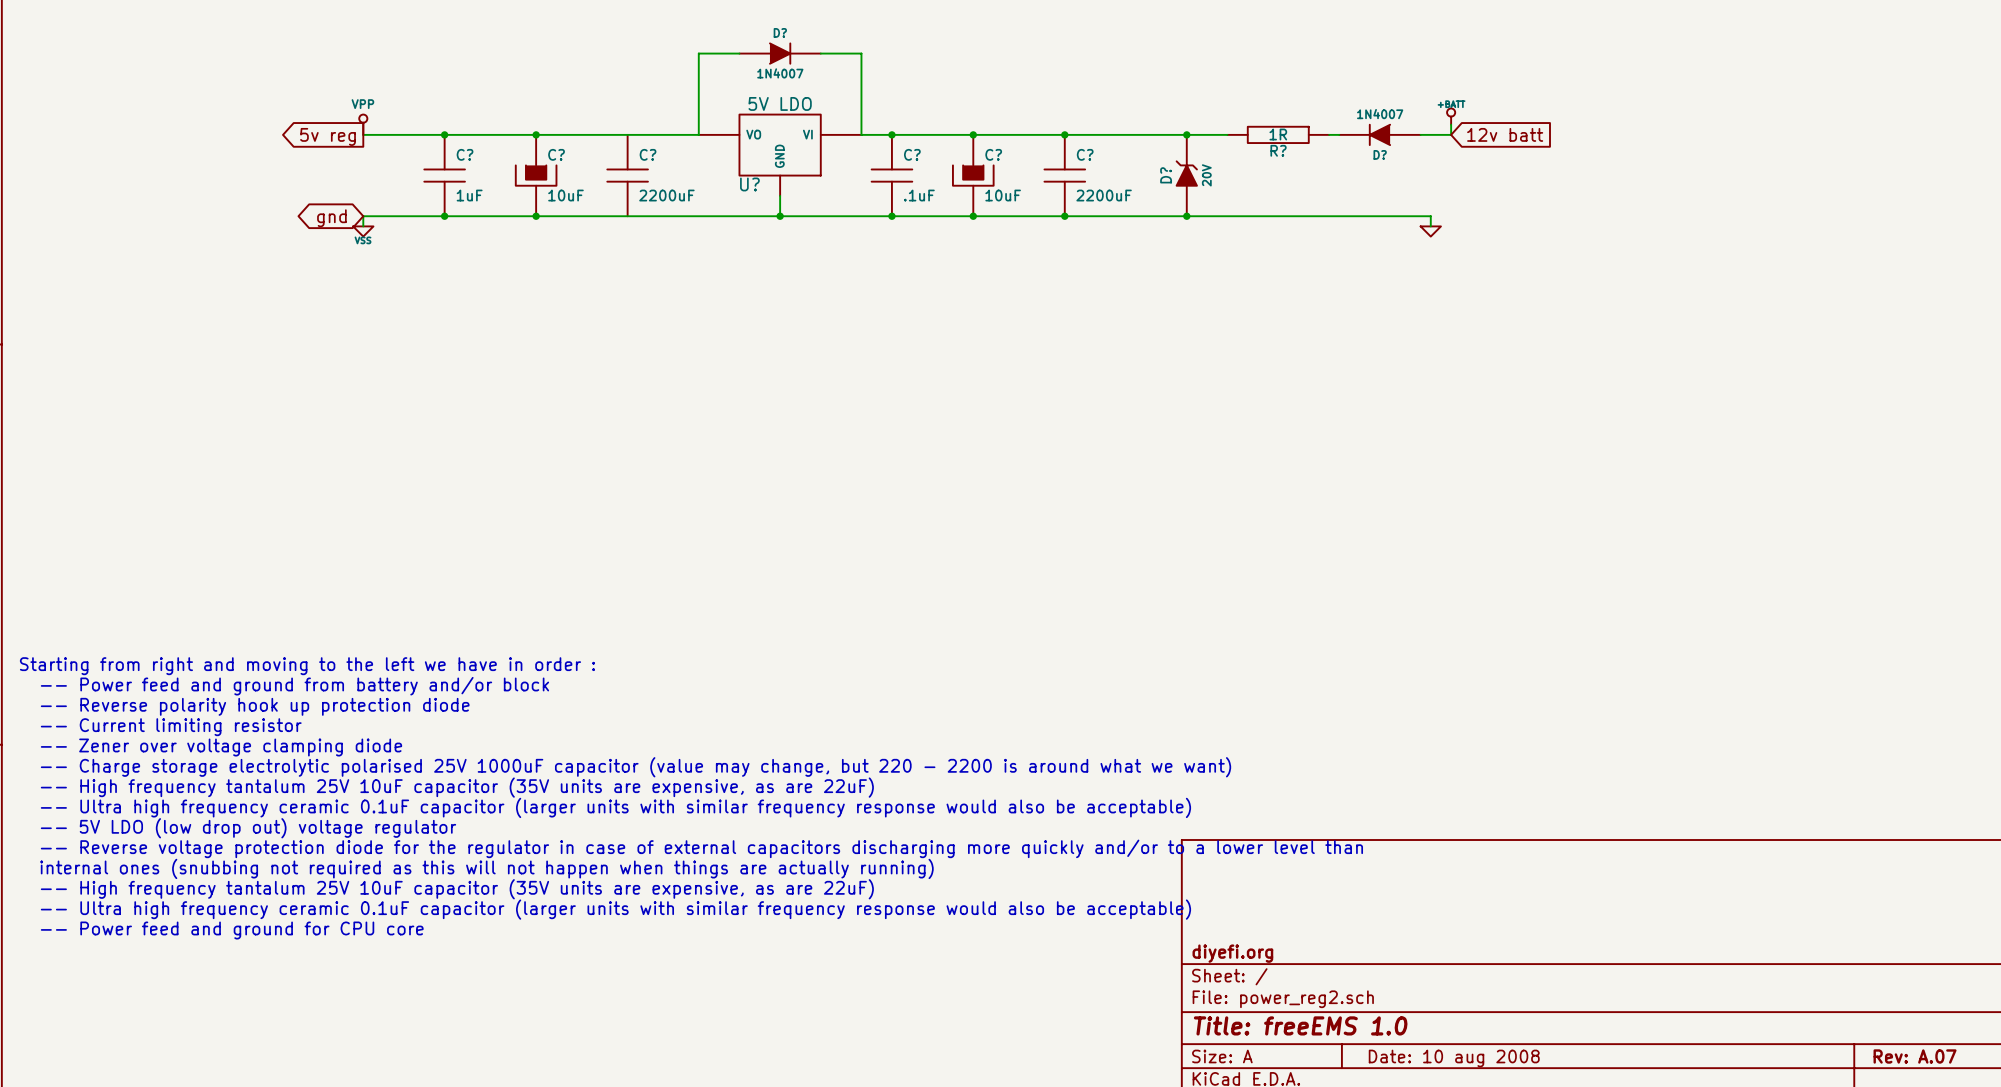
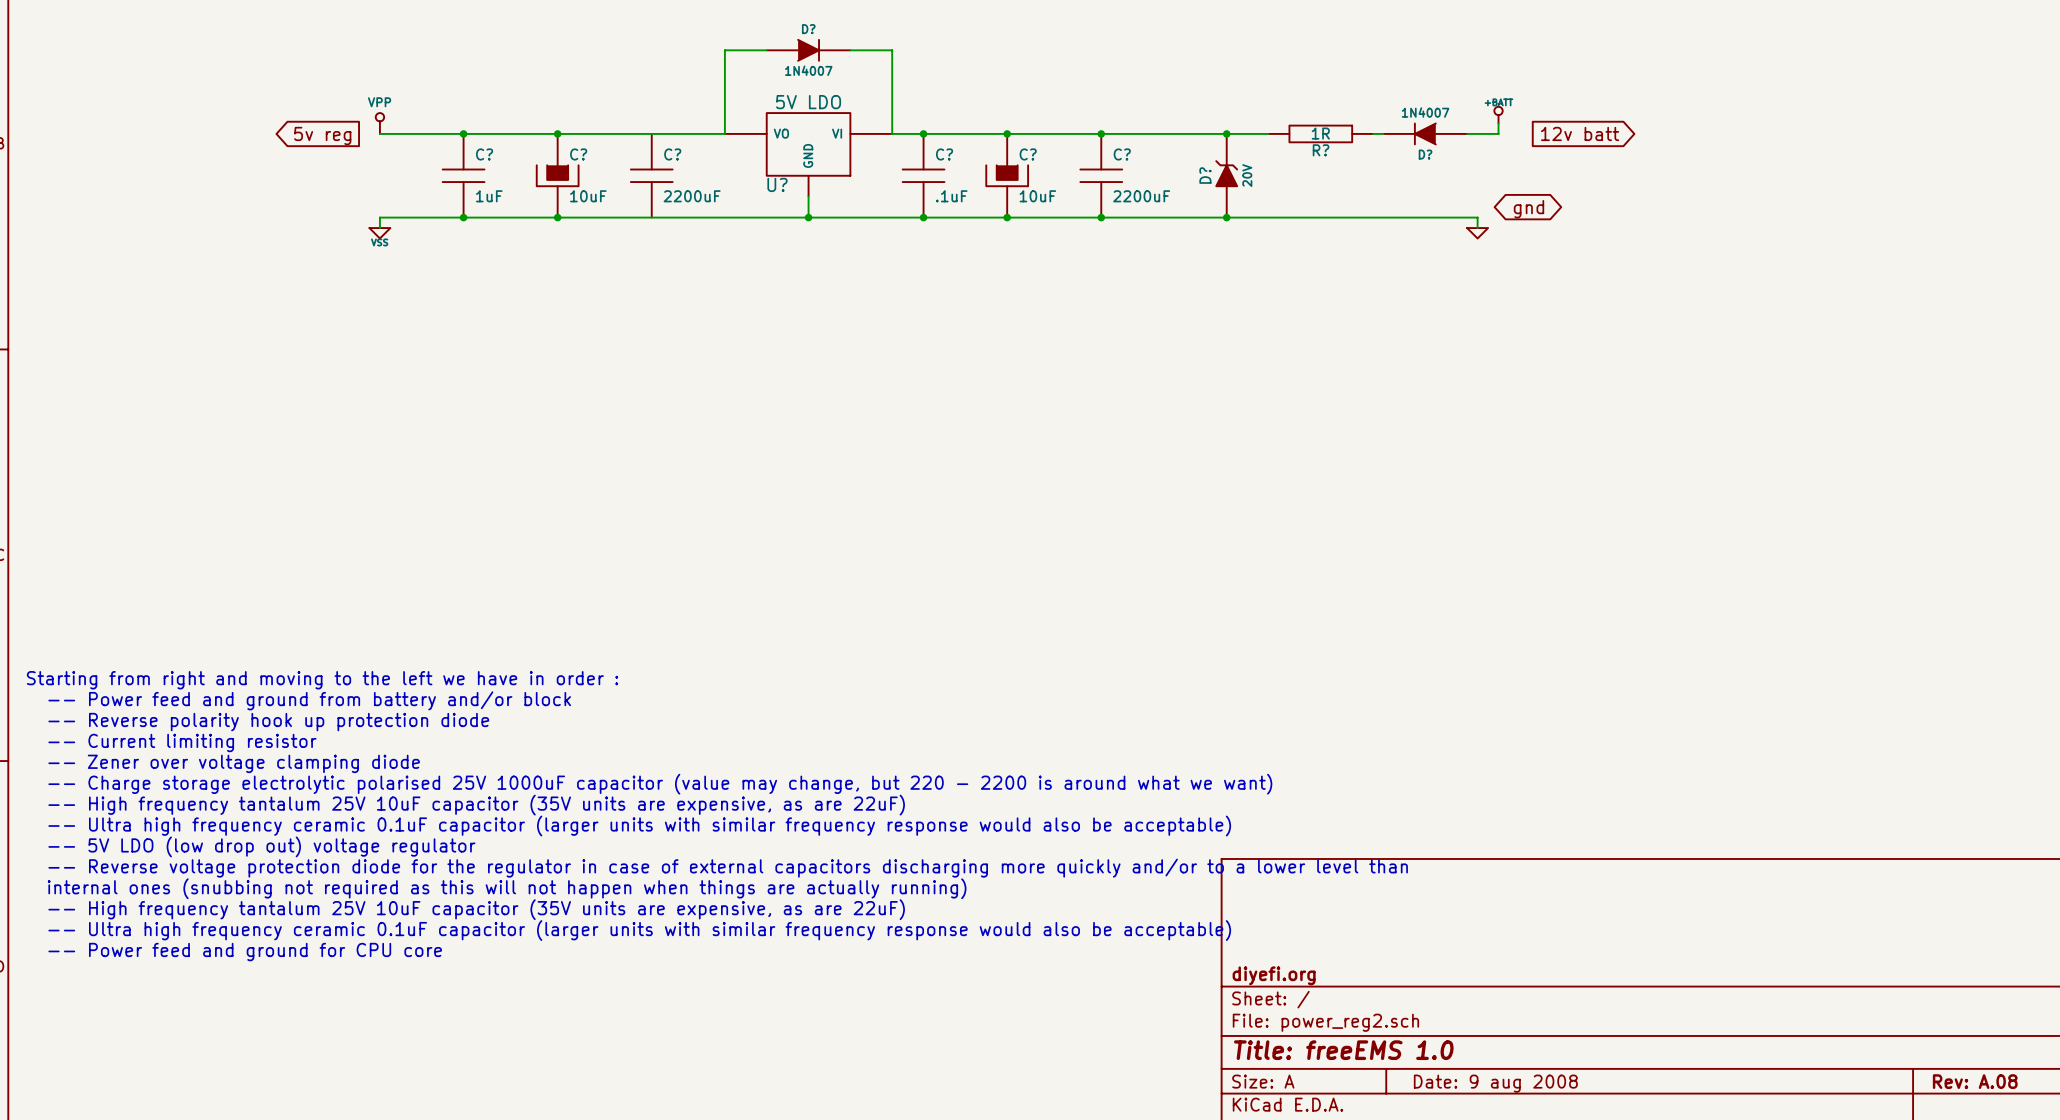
global label rotation: 0° (1505, 134) -> 180° (1580, 133)
global label position: 5v reg (328, 136) -> 5v reg (322, 136)
global label: none -> gnd (1528, 209)
global label: gnd (331, 218) -> none
title block: Rev: A.07 (1915, 1056) -> Rev: A.08 (1975, 1081)
title block: Date: 10 aug 2008 (1454, 1058) -> Date: 9 aug 2008 (1495, 1083)

